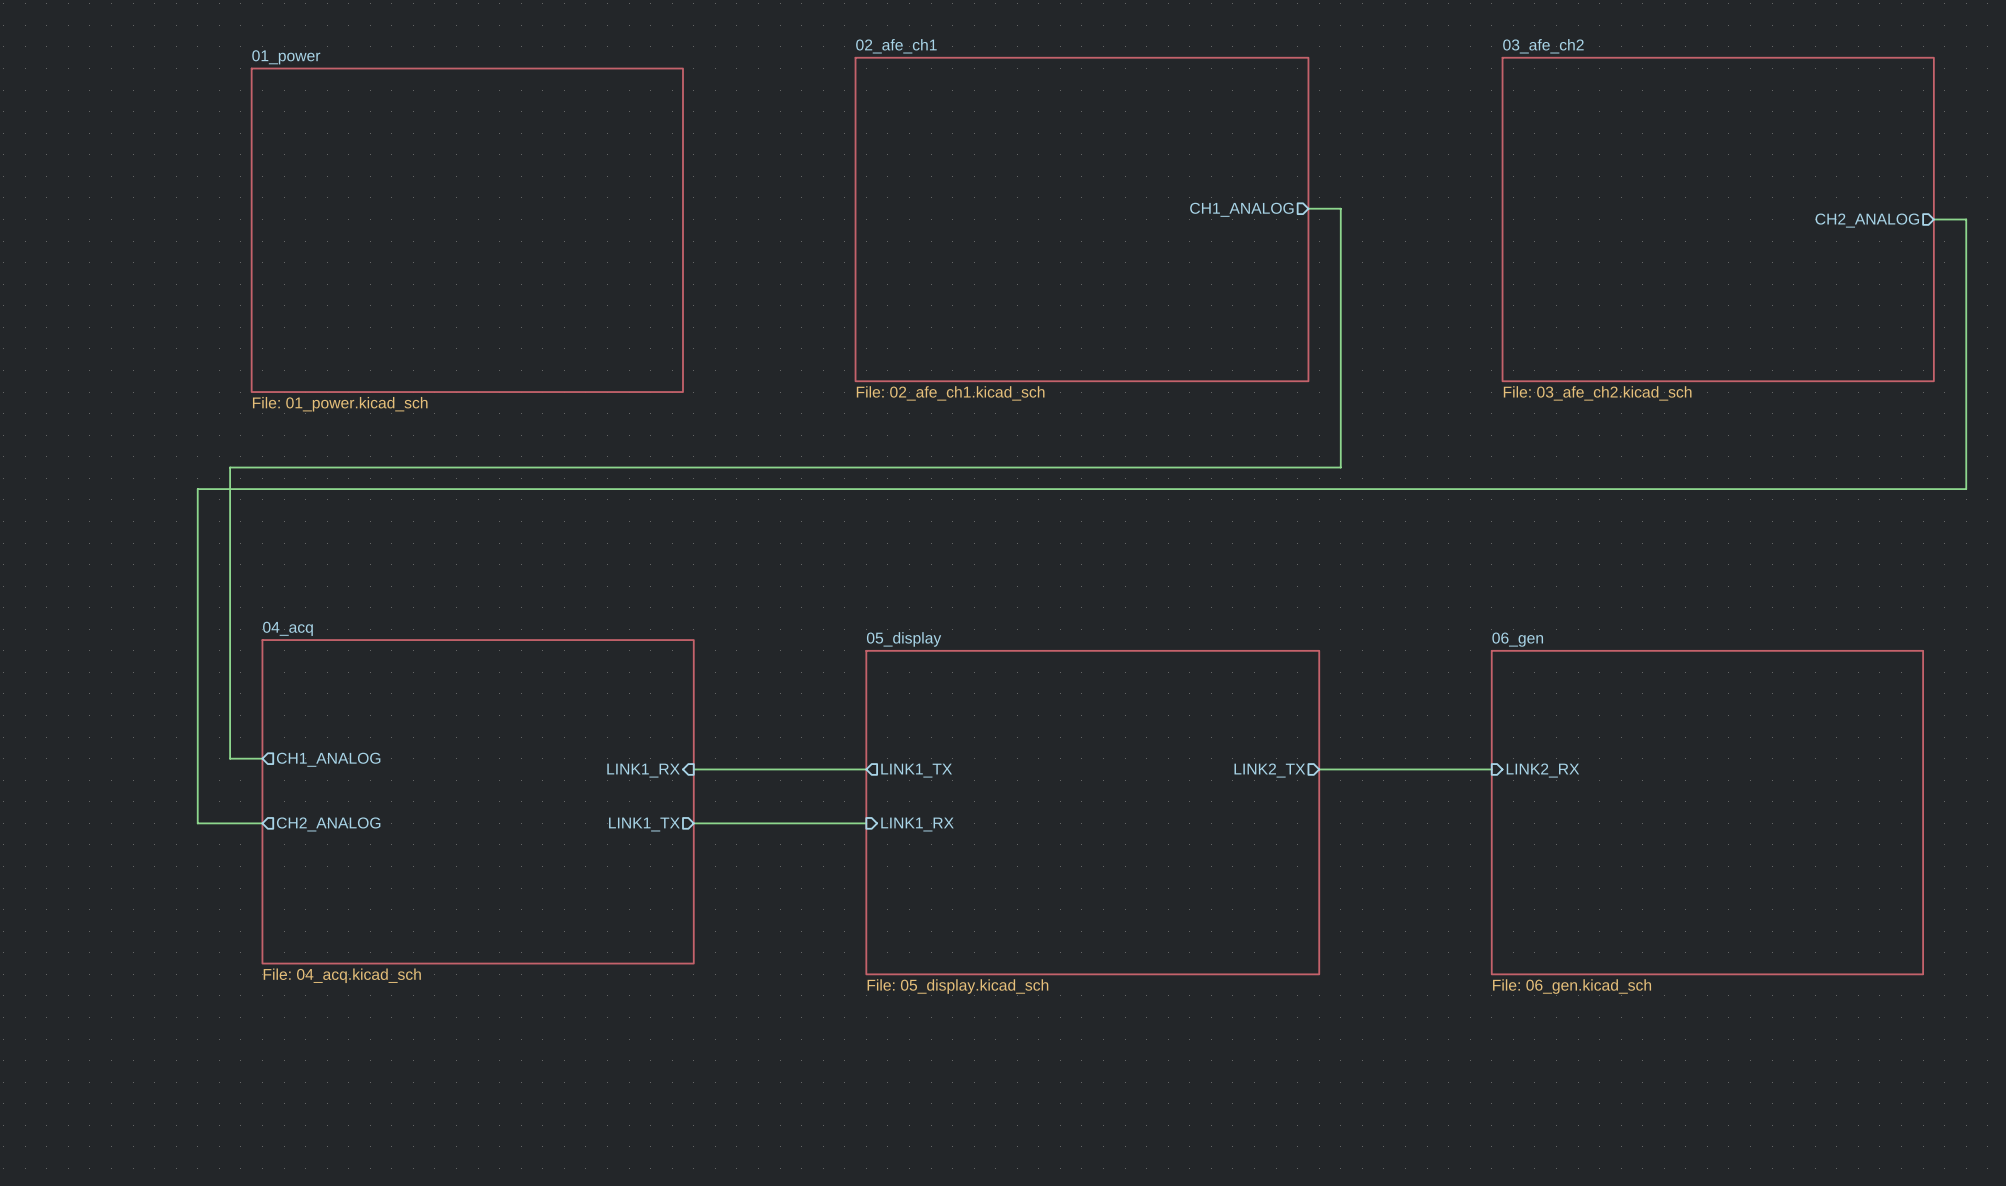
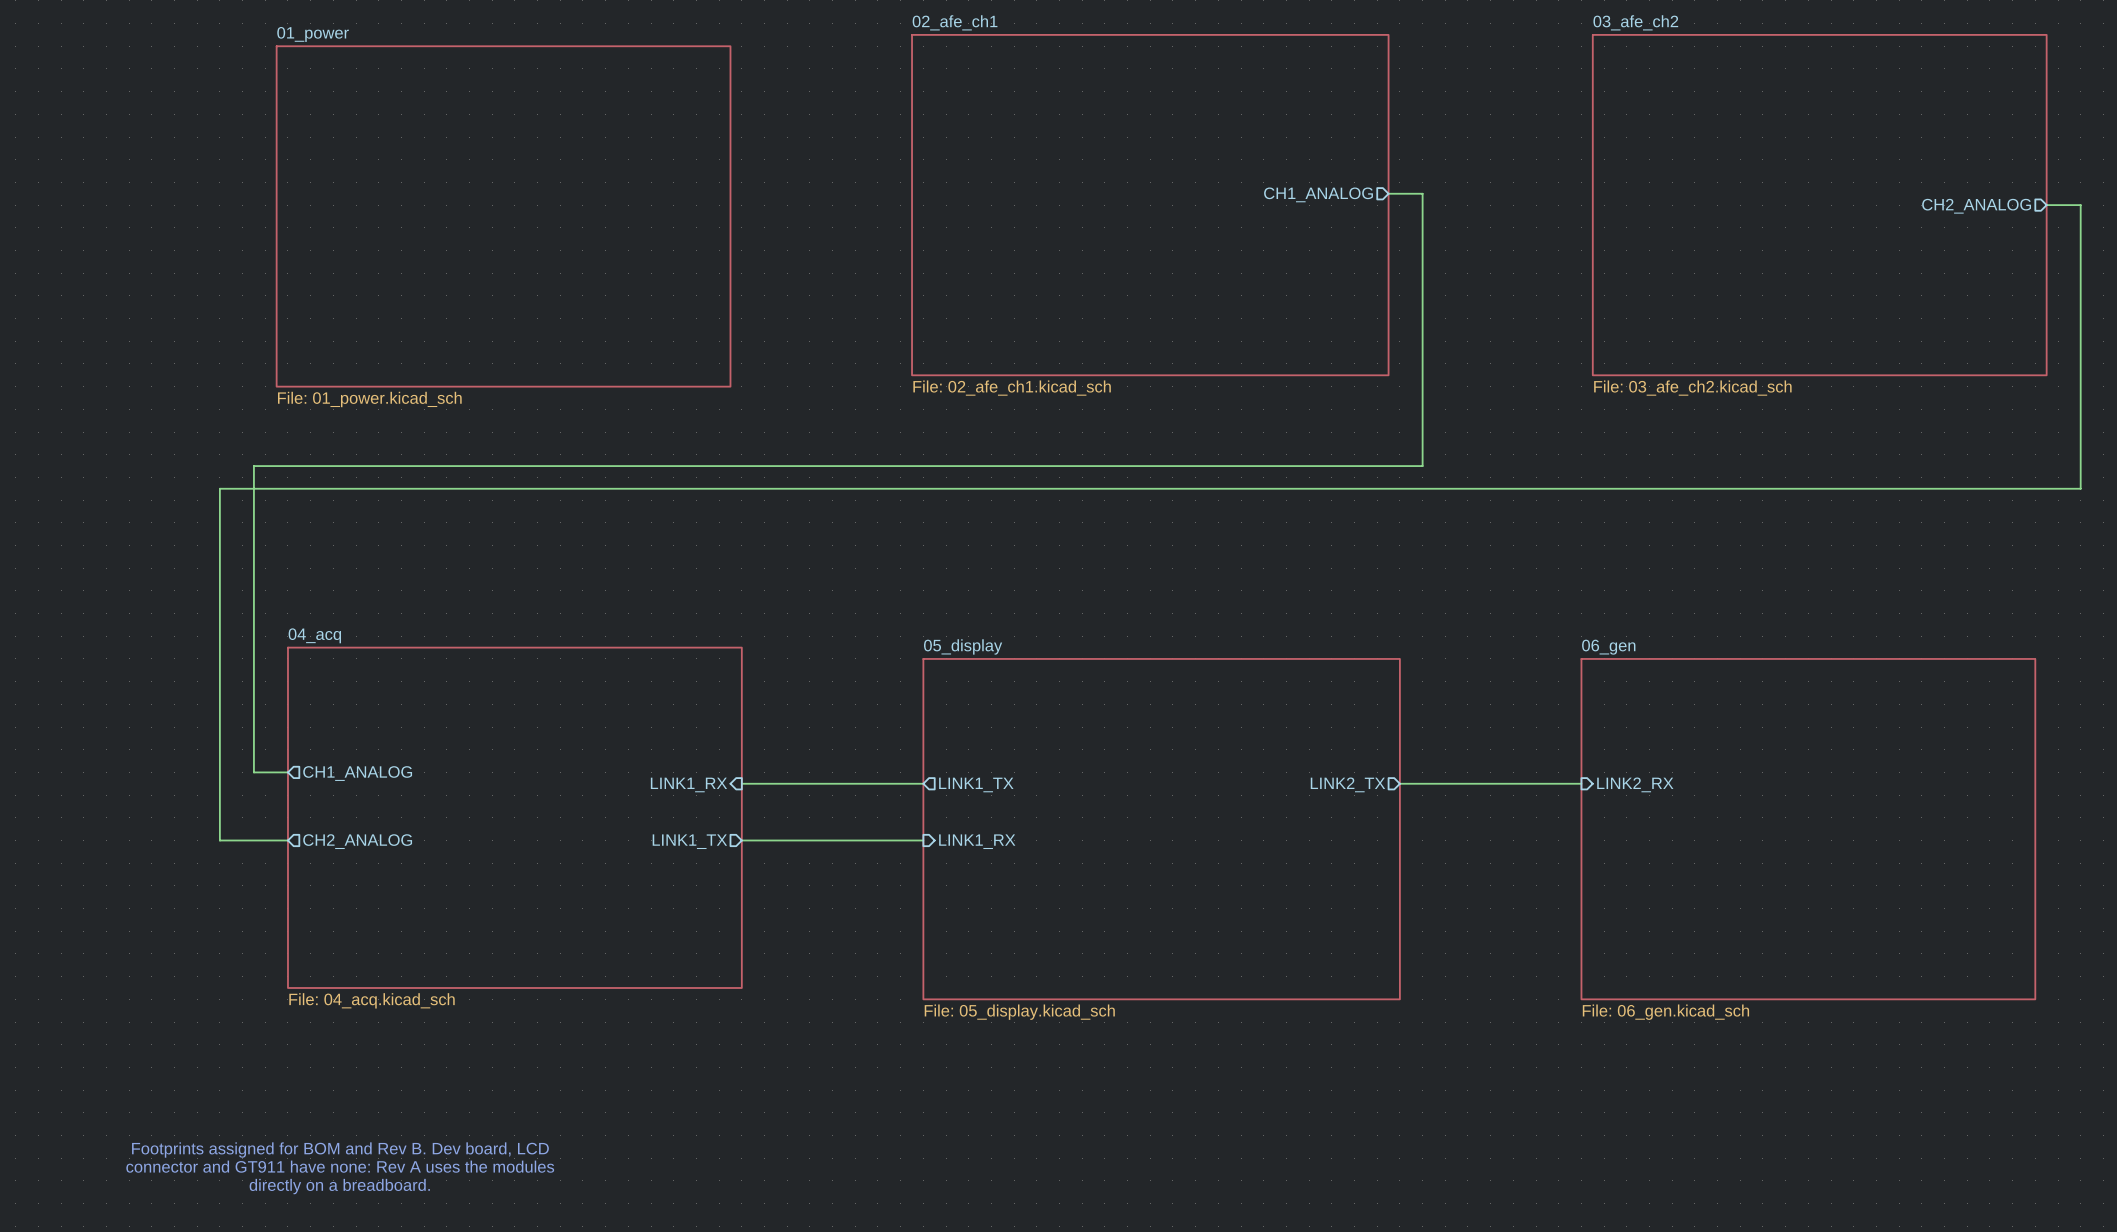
text: none -> Footprints assigned for BOM and Rev B. Dev board, LCD (340, 1150)
text: none -> connector and GT911 have none: Rev A uses the modules (340, 1166)
text: none -> directly on a breadboard. (339, 1186)

